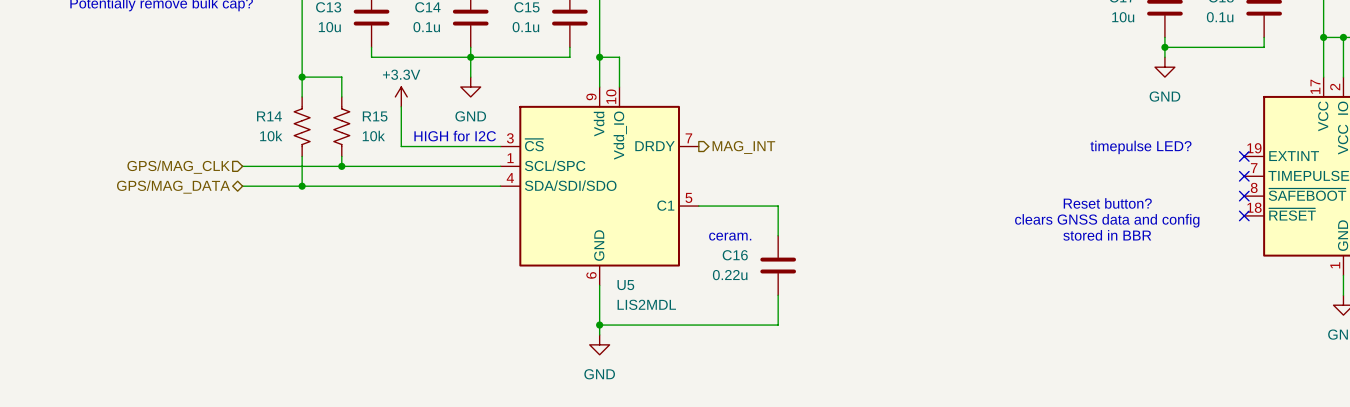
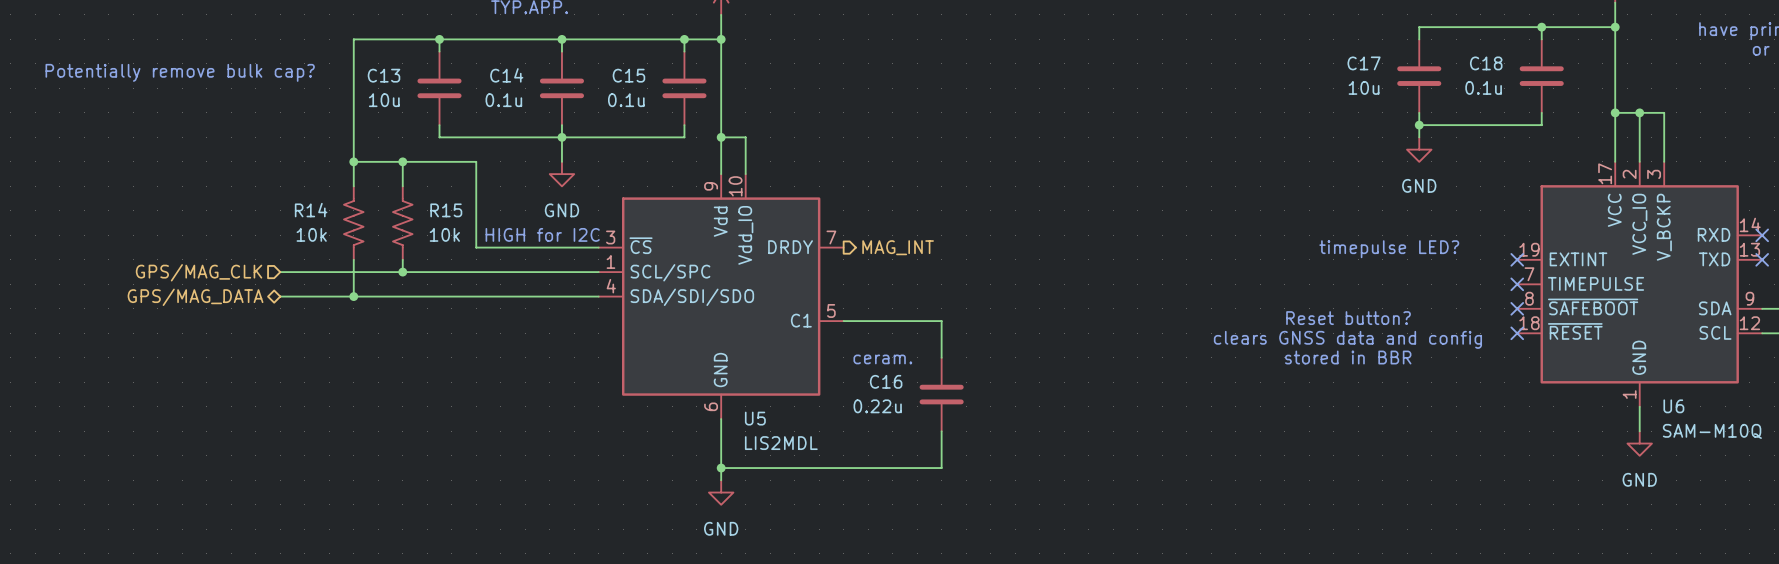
wire: none -> (402, 161) (476, 161) (476, 198)
junction: none -> (402, 161)
power symbol: +3.3V (401, 96) -> none

